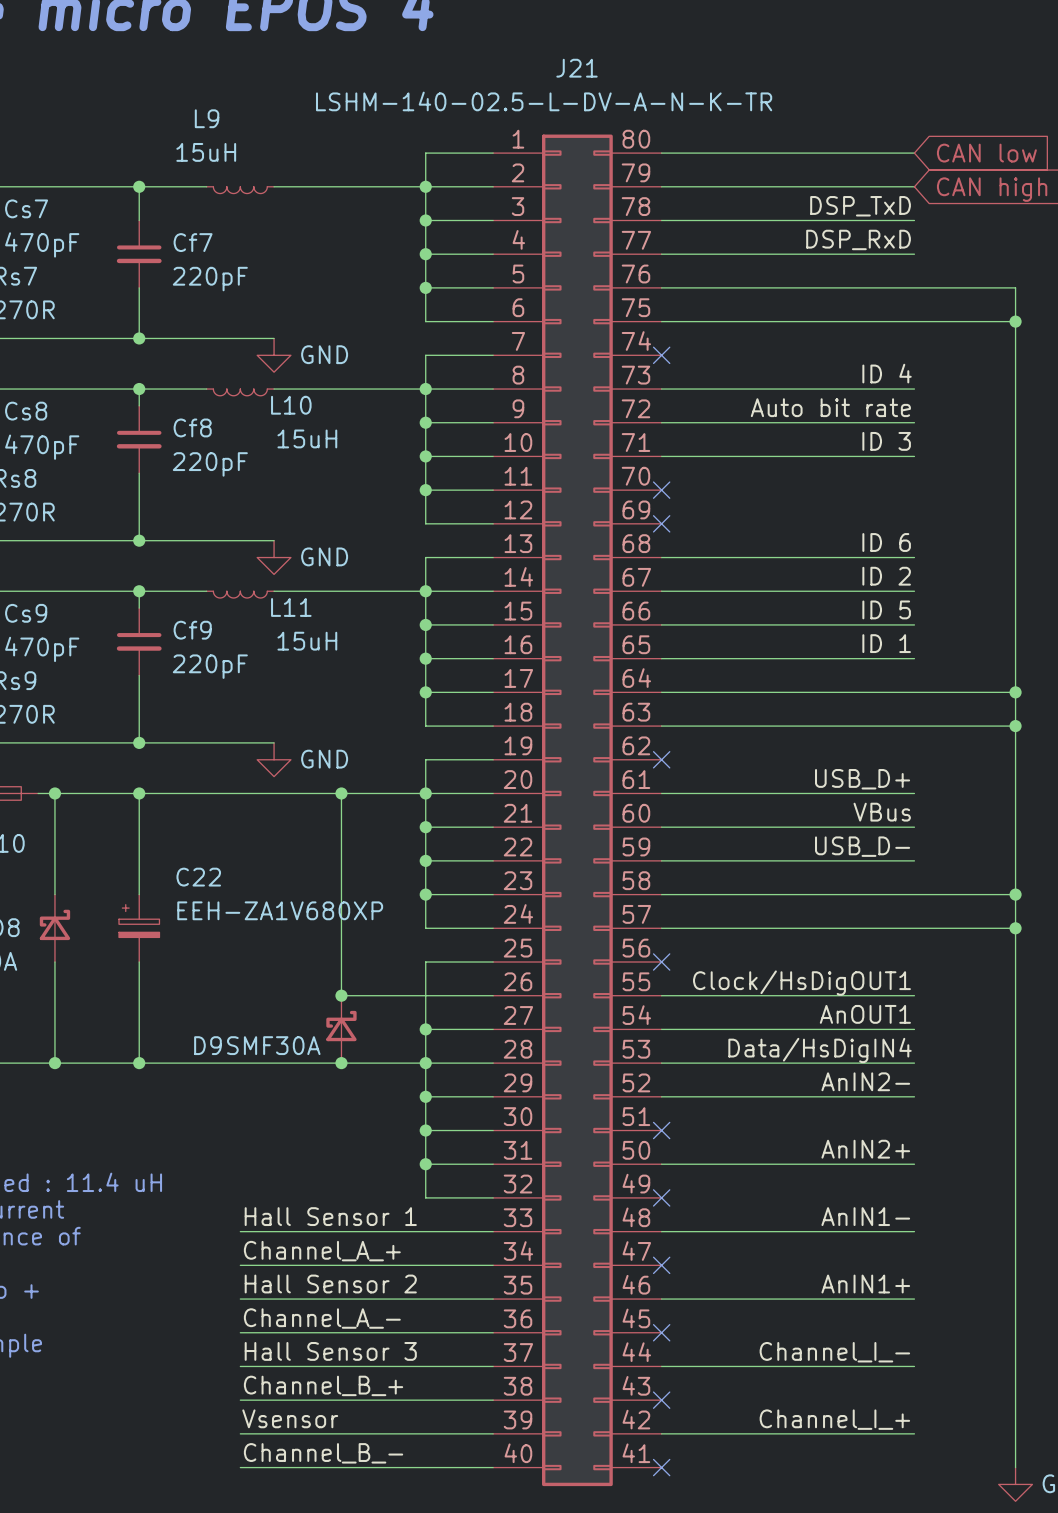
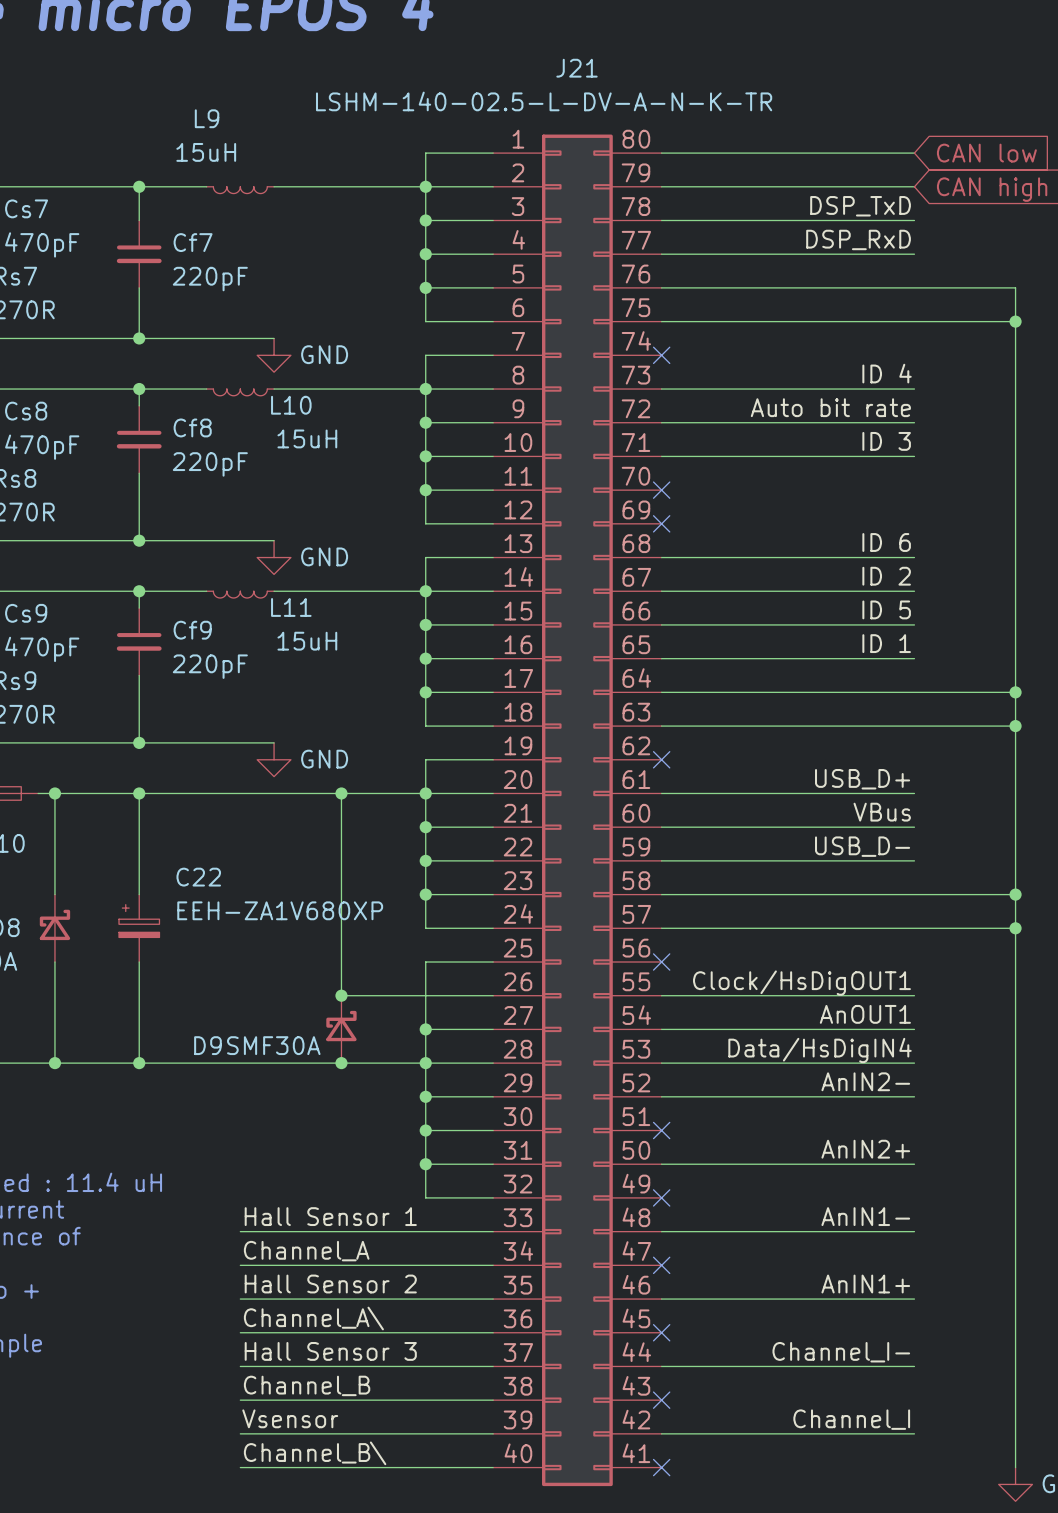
label: Channel_A_+ (322, 1251) -> Channel_A (306, 1251)
label: Channel_A_- (322, 1318) -> Channel_A\ (313, 1318)
label: Channel_I_- (834, 1352) -> Channel_I- (841, 1352)
label: Channel_B_+ (323, 1385) -> Channel_B (307, 1385)
label: Channel_I_+ (834, 1419) -> Channel_I (851, 1419)
label: Channel_B_- (323, 1453) -> Channel_B\ (315, 1453)

